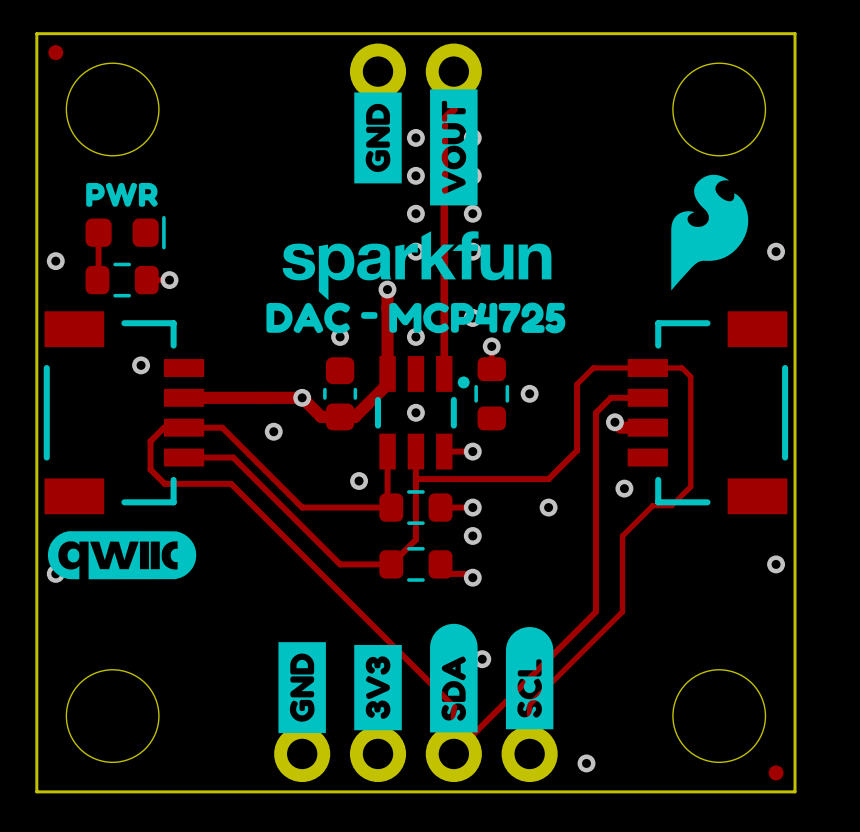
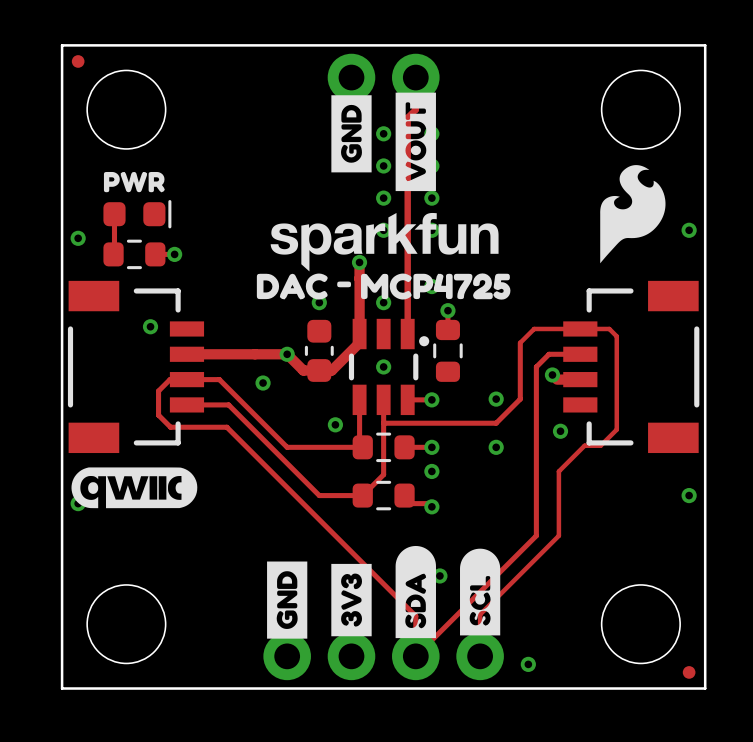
via position: (529, 393) -> (496, 399)

